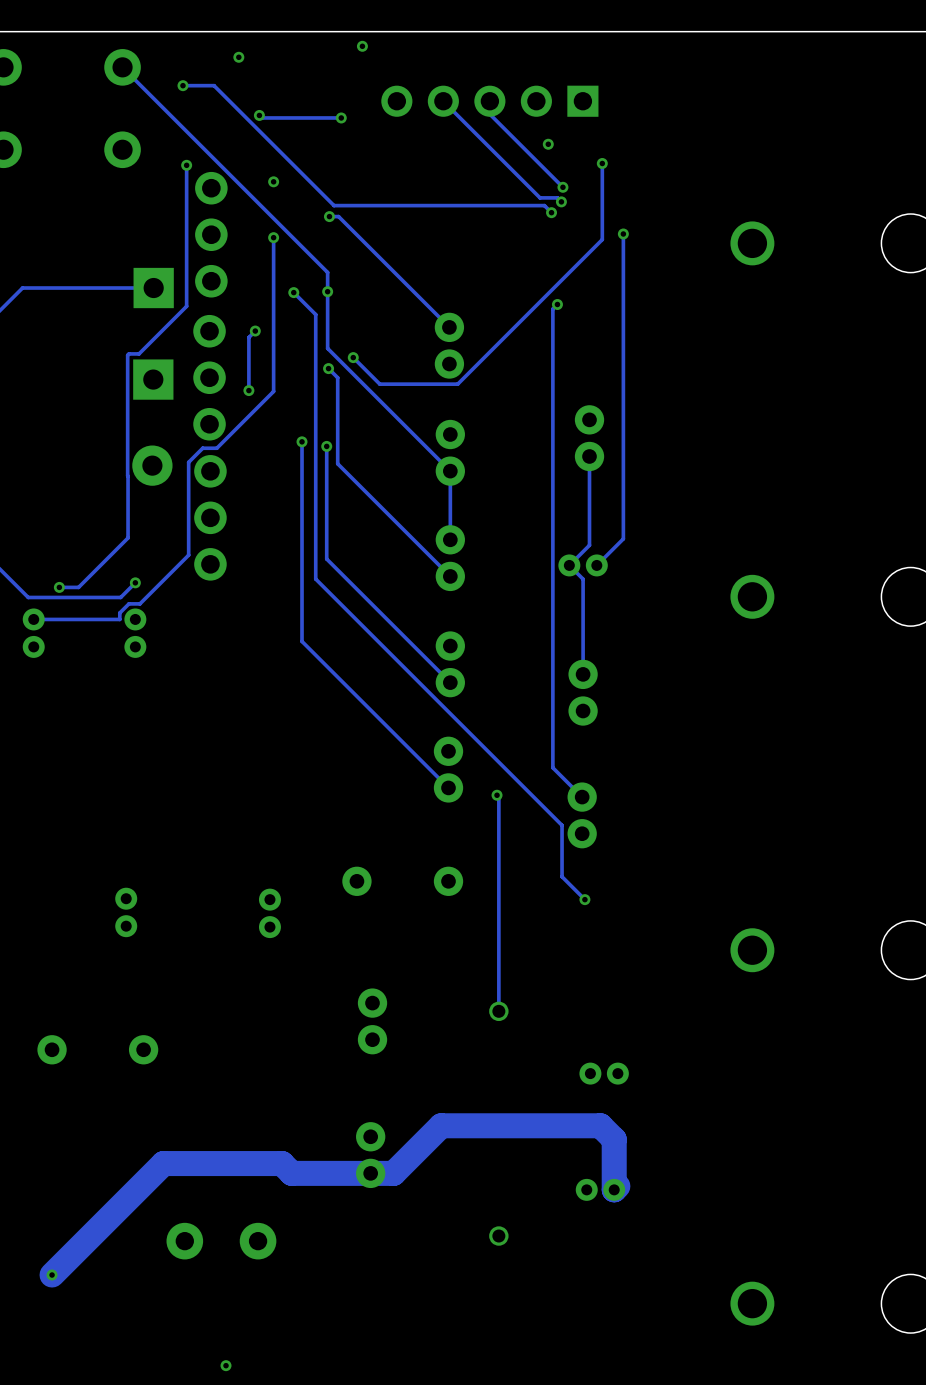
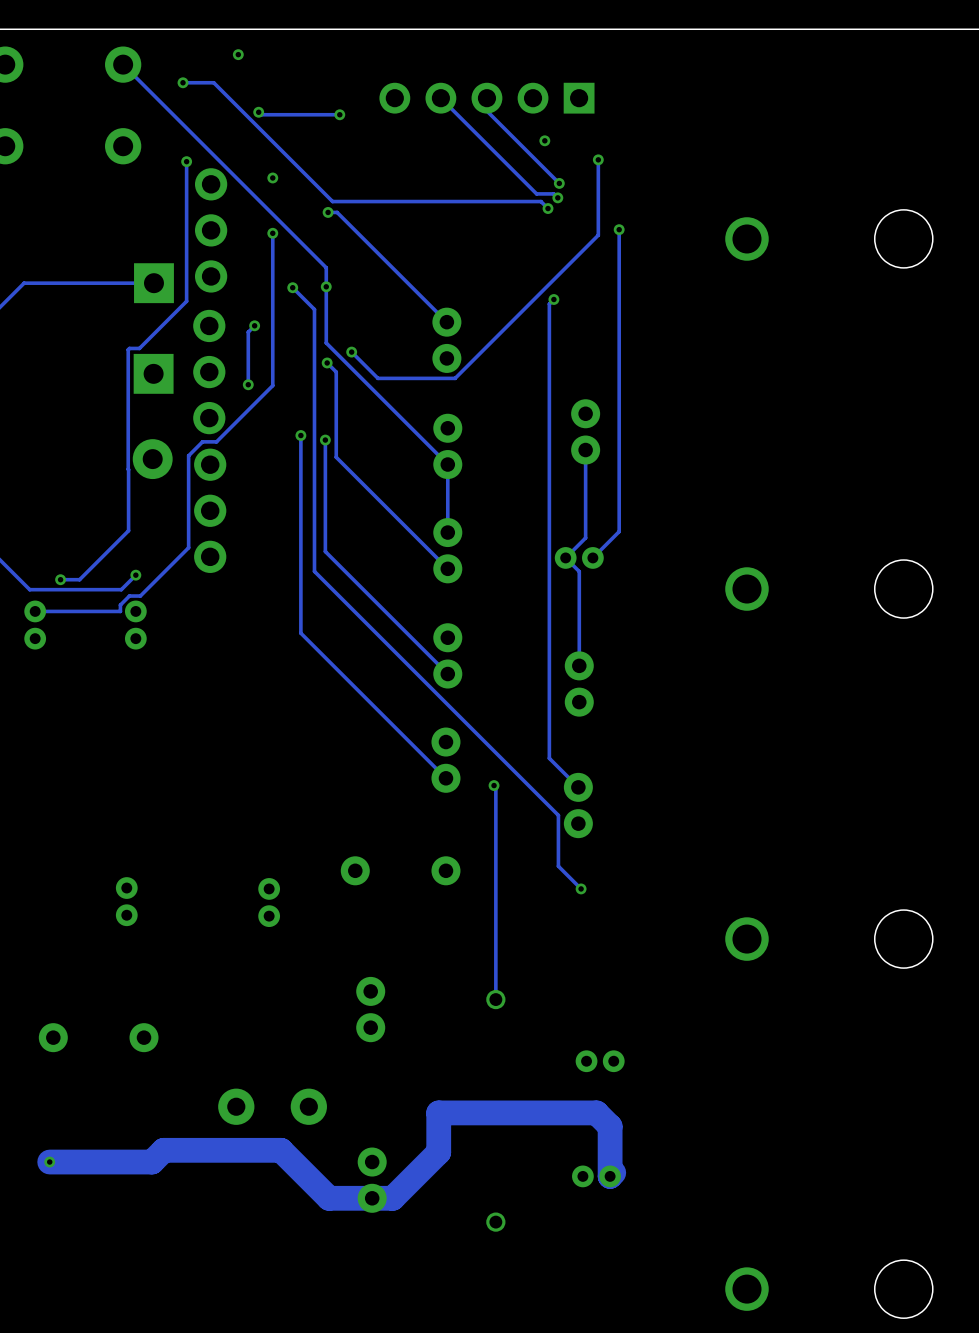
via: (362, 46) -> none
track: (441, 1125) (393, 1173) (291, 1173) -> (438, 1112) (438, 1152) (392, 1198) (329, 1198) (290, 1160)
part position: (370, 1155) -> (372, 1180)
track: (151, 1175) (52, 1275) -> (152, 1162) (49, 1162)
part position: (221, 1241) -> (272, 1106)
via position: (52, 1275) -> (49, 1162)

